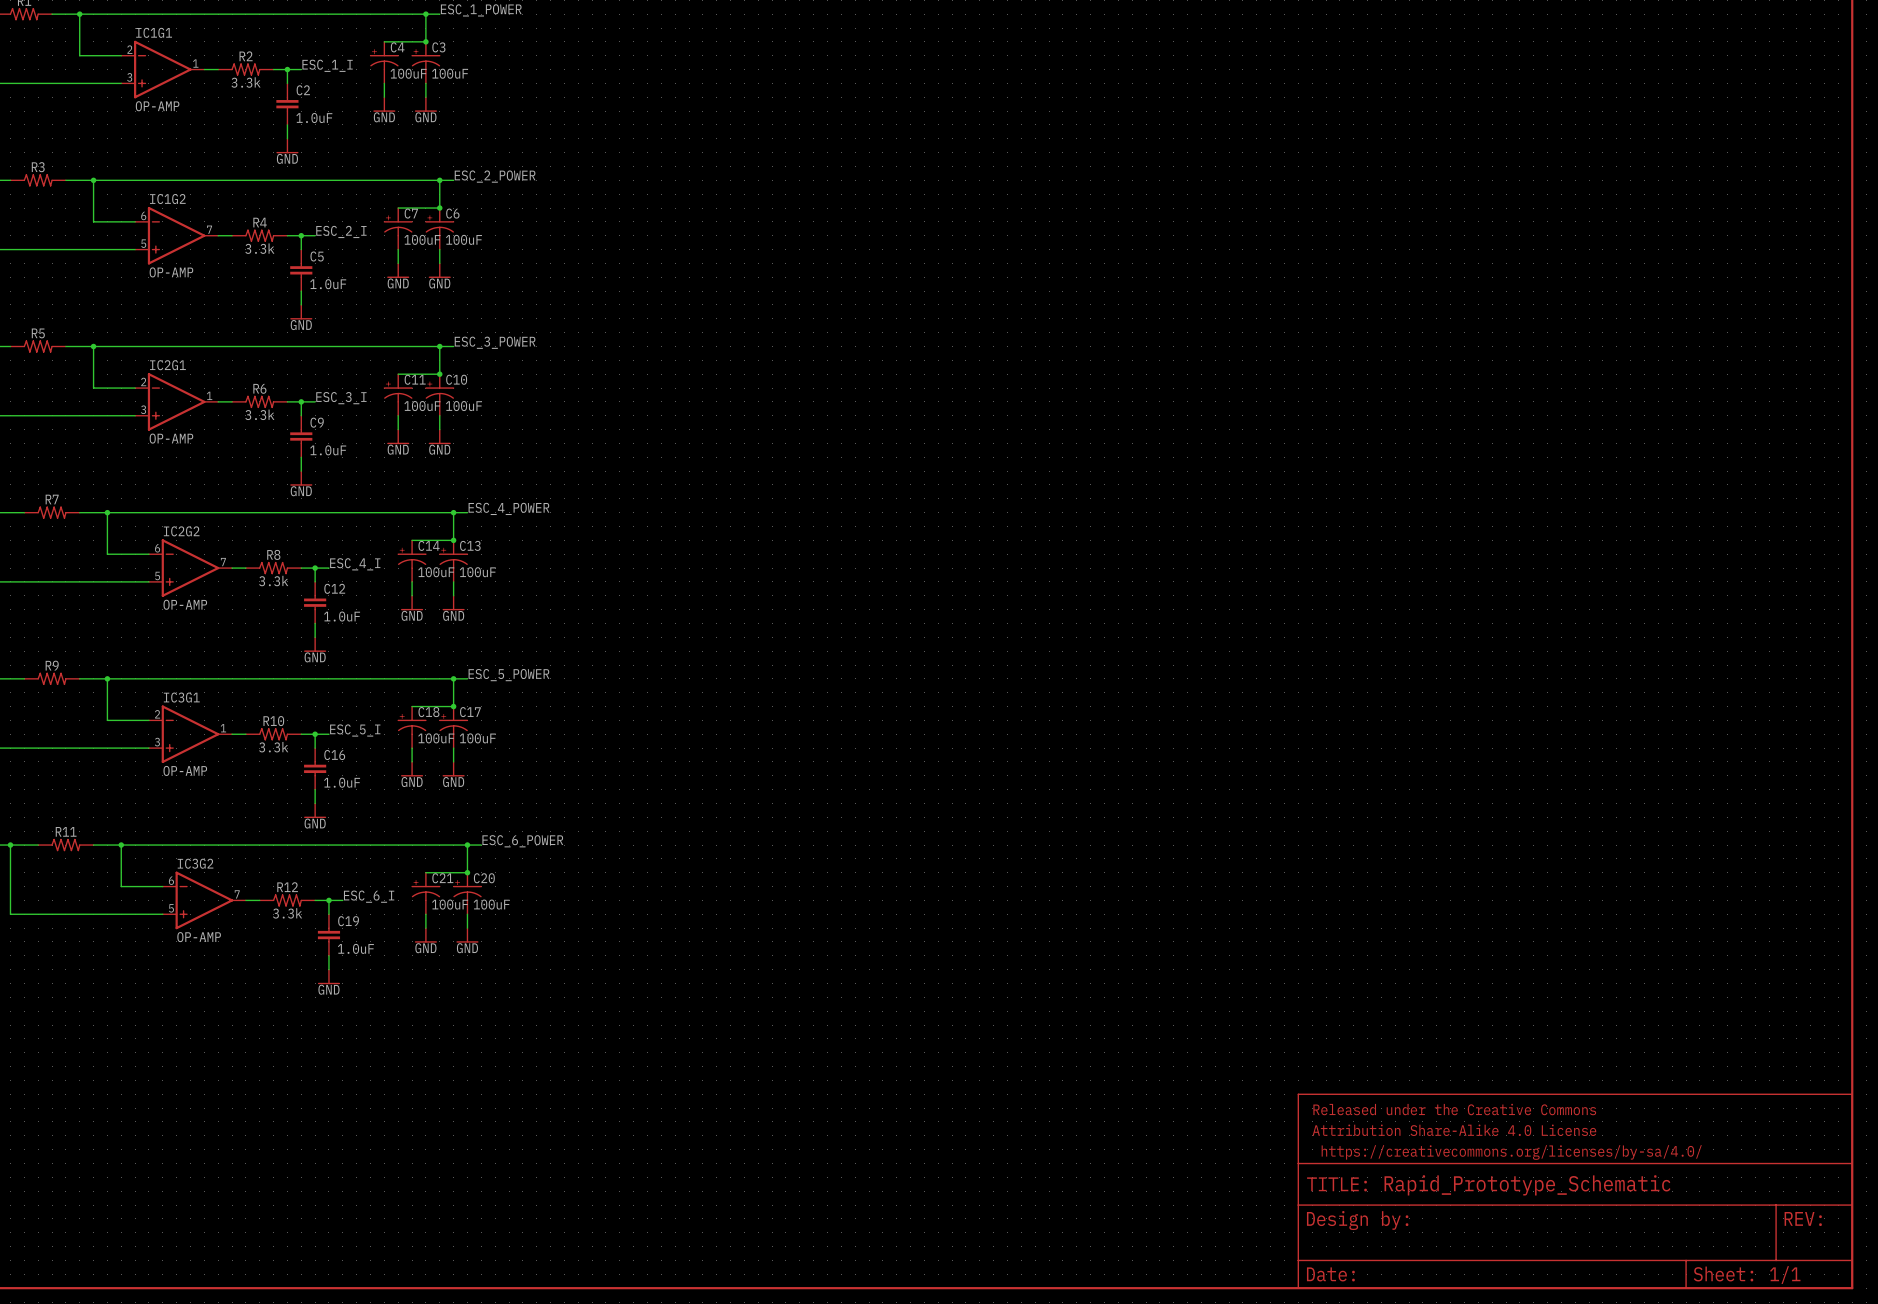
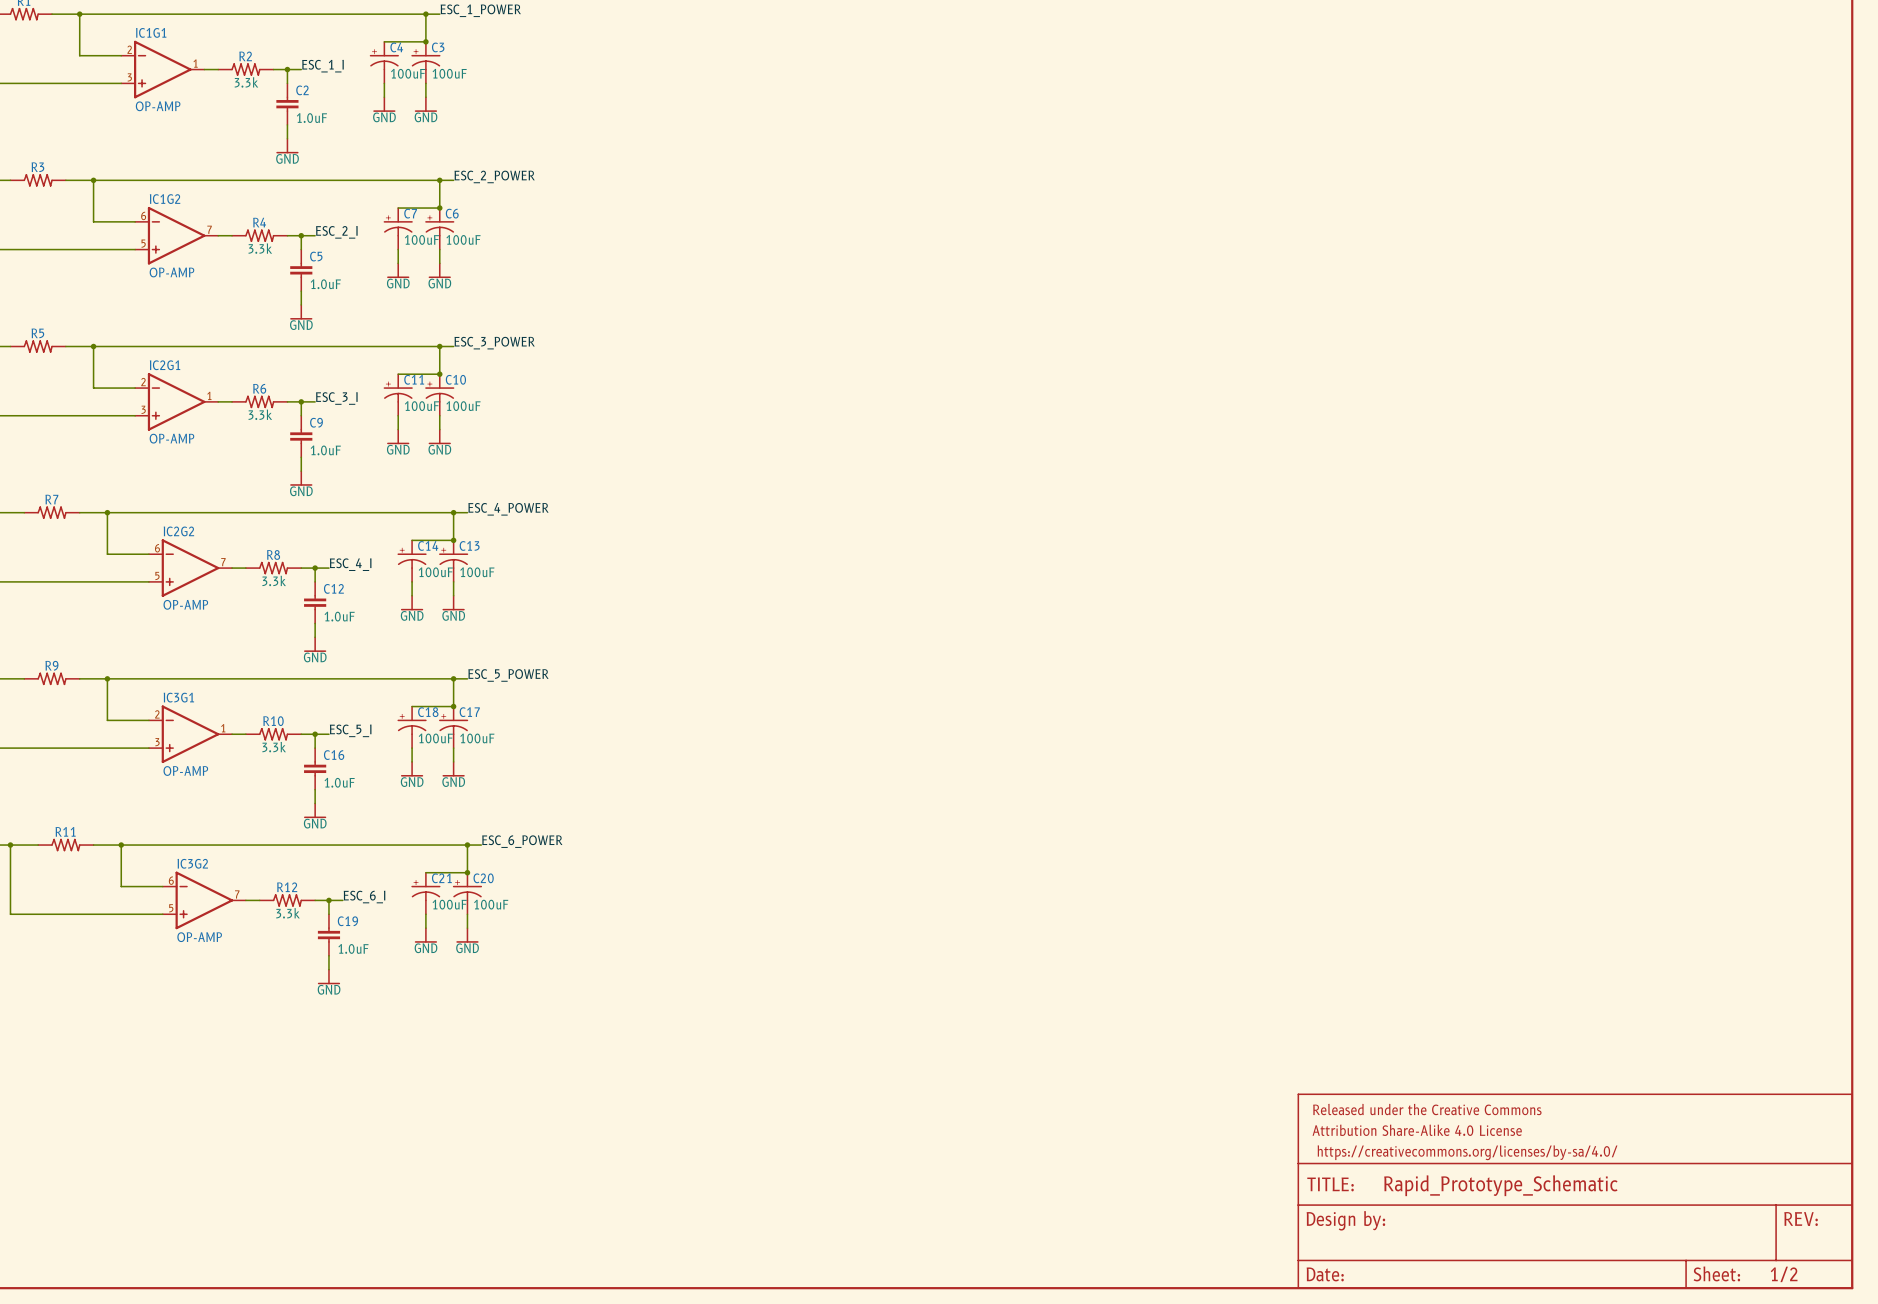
part text: 1/1 (1785, 1275) -> 1/2 (1784, 1274)

